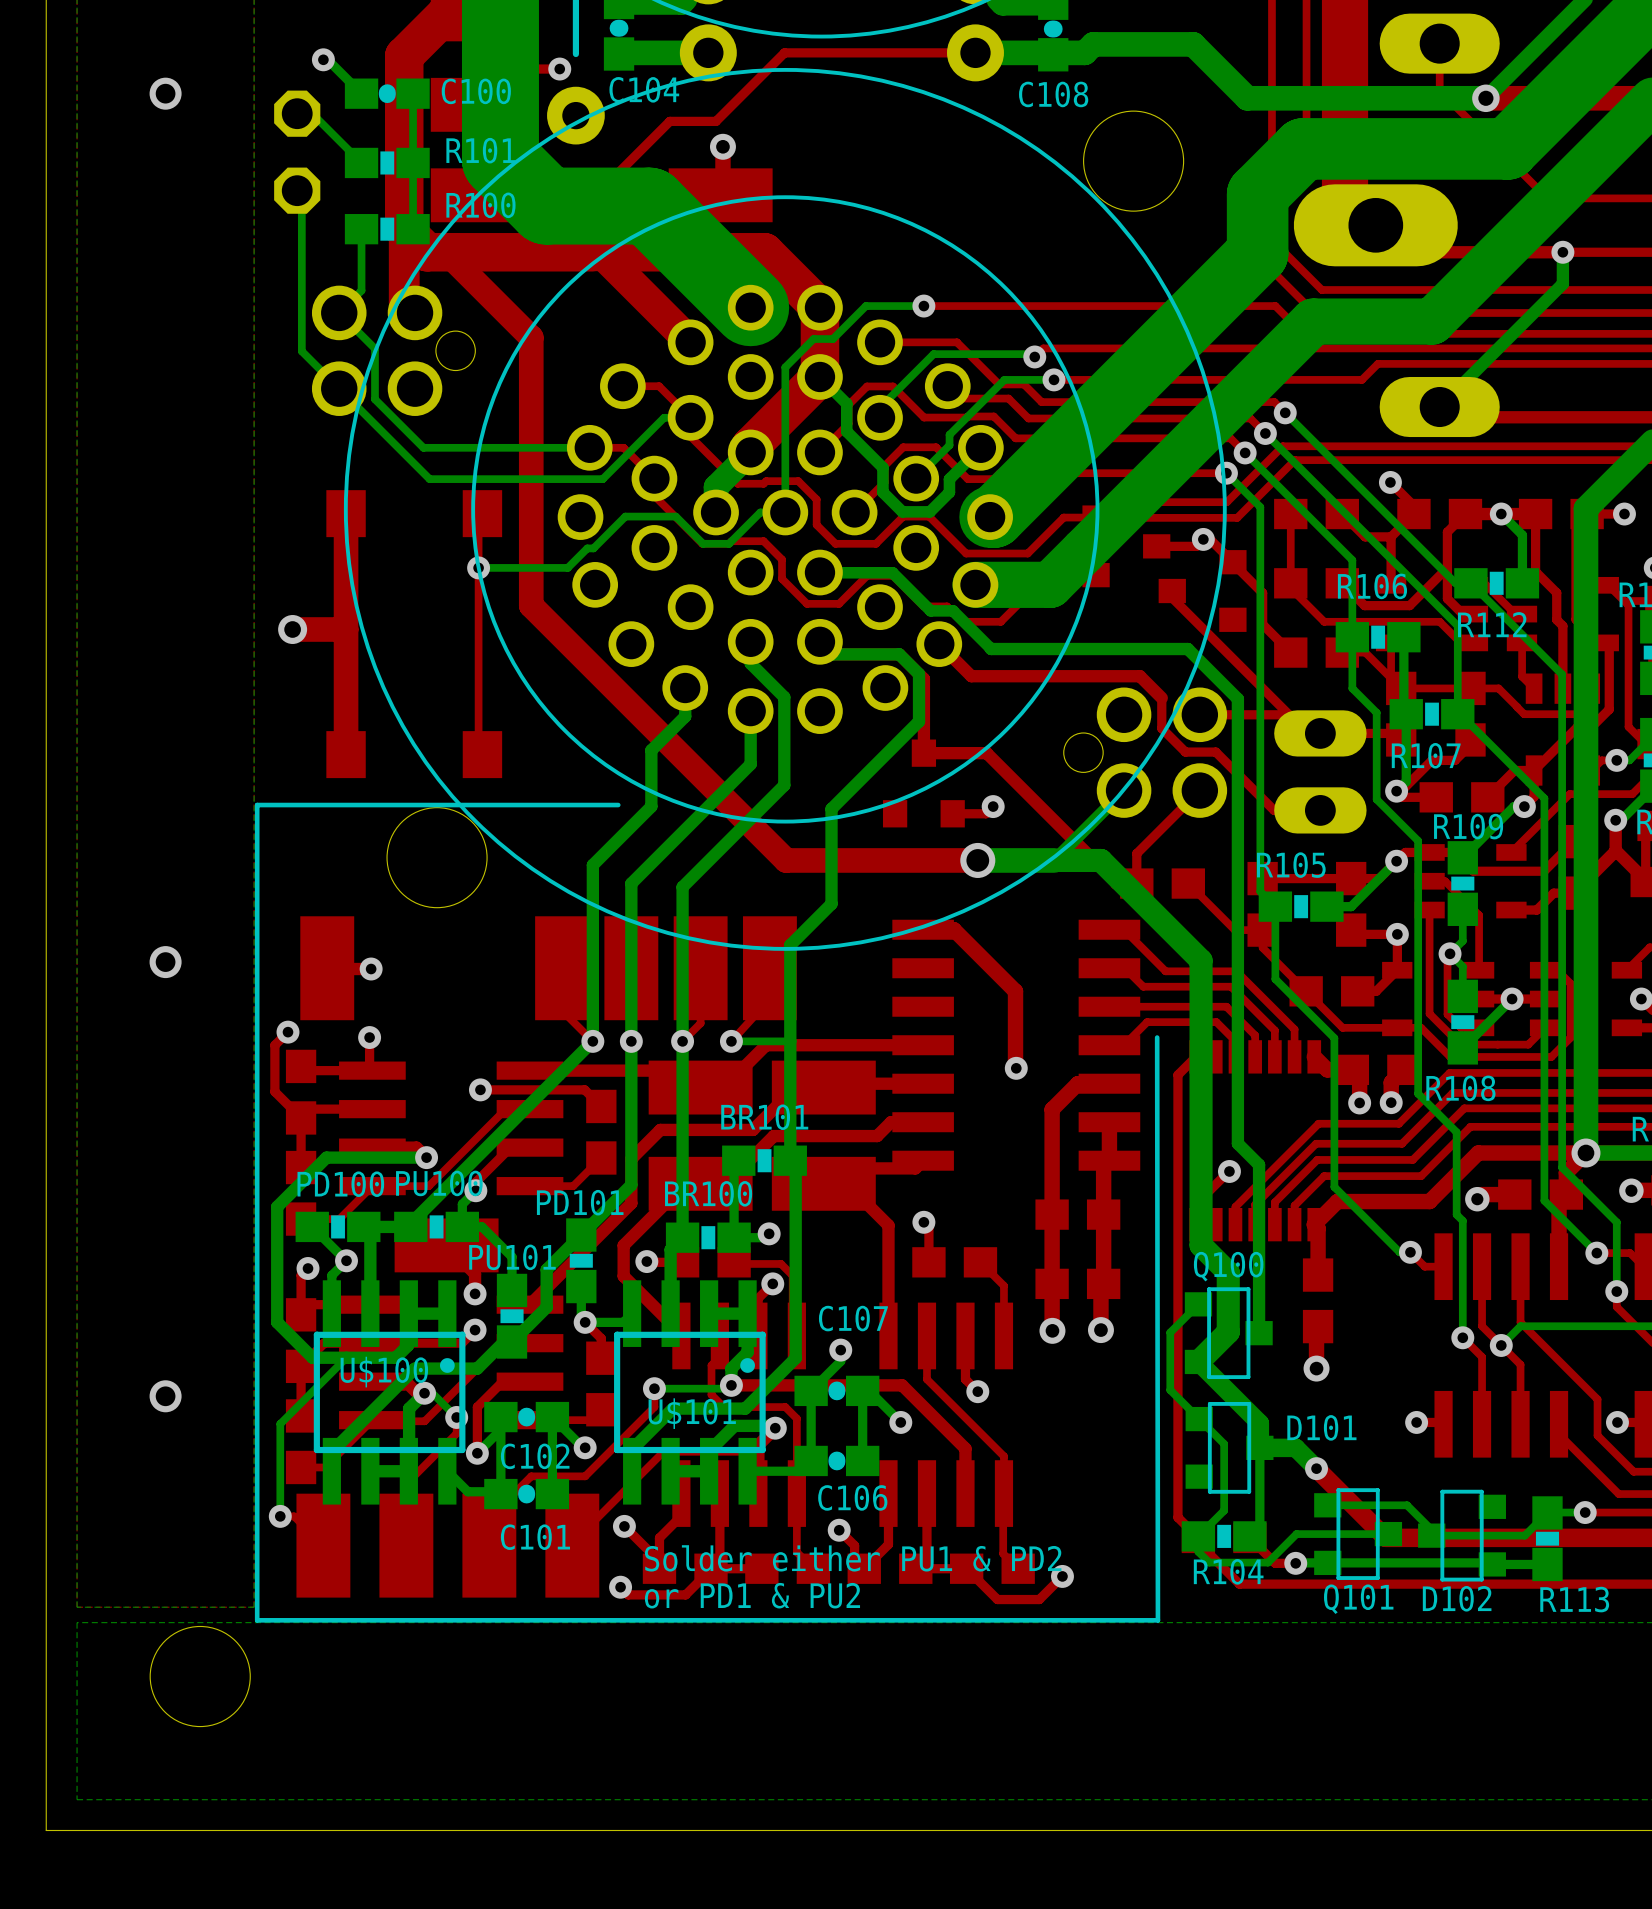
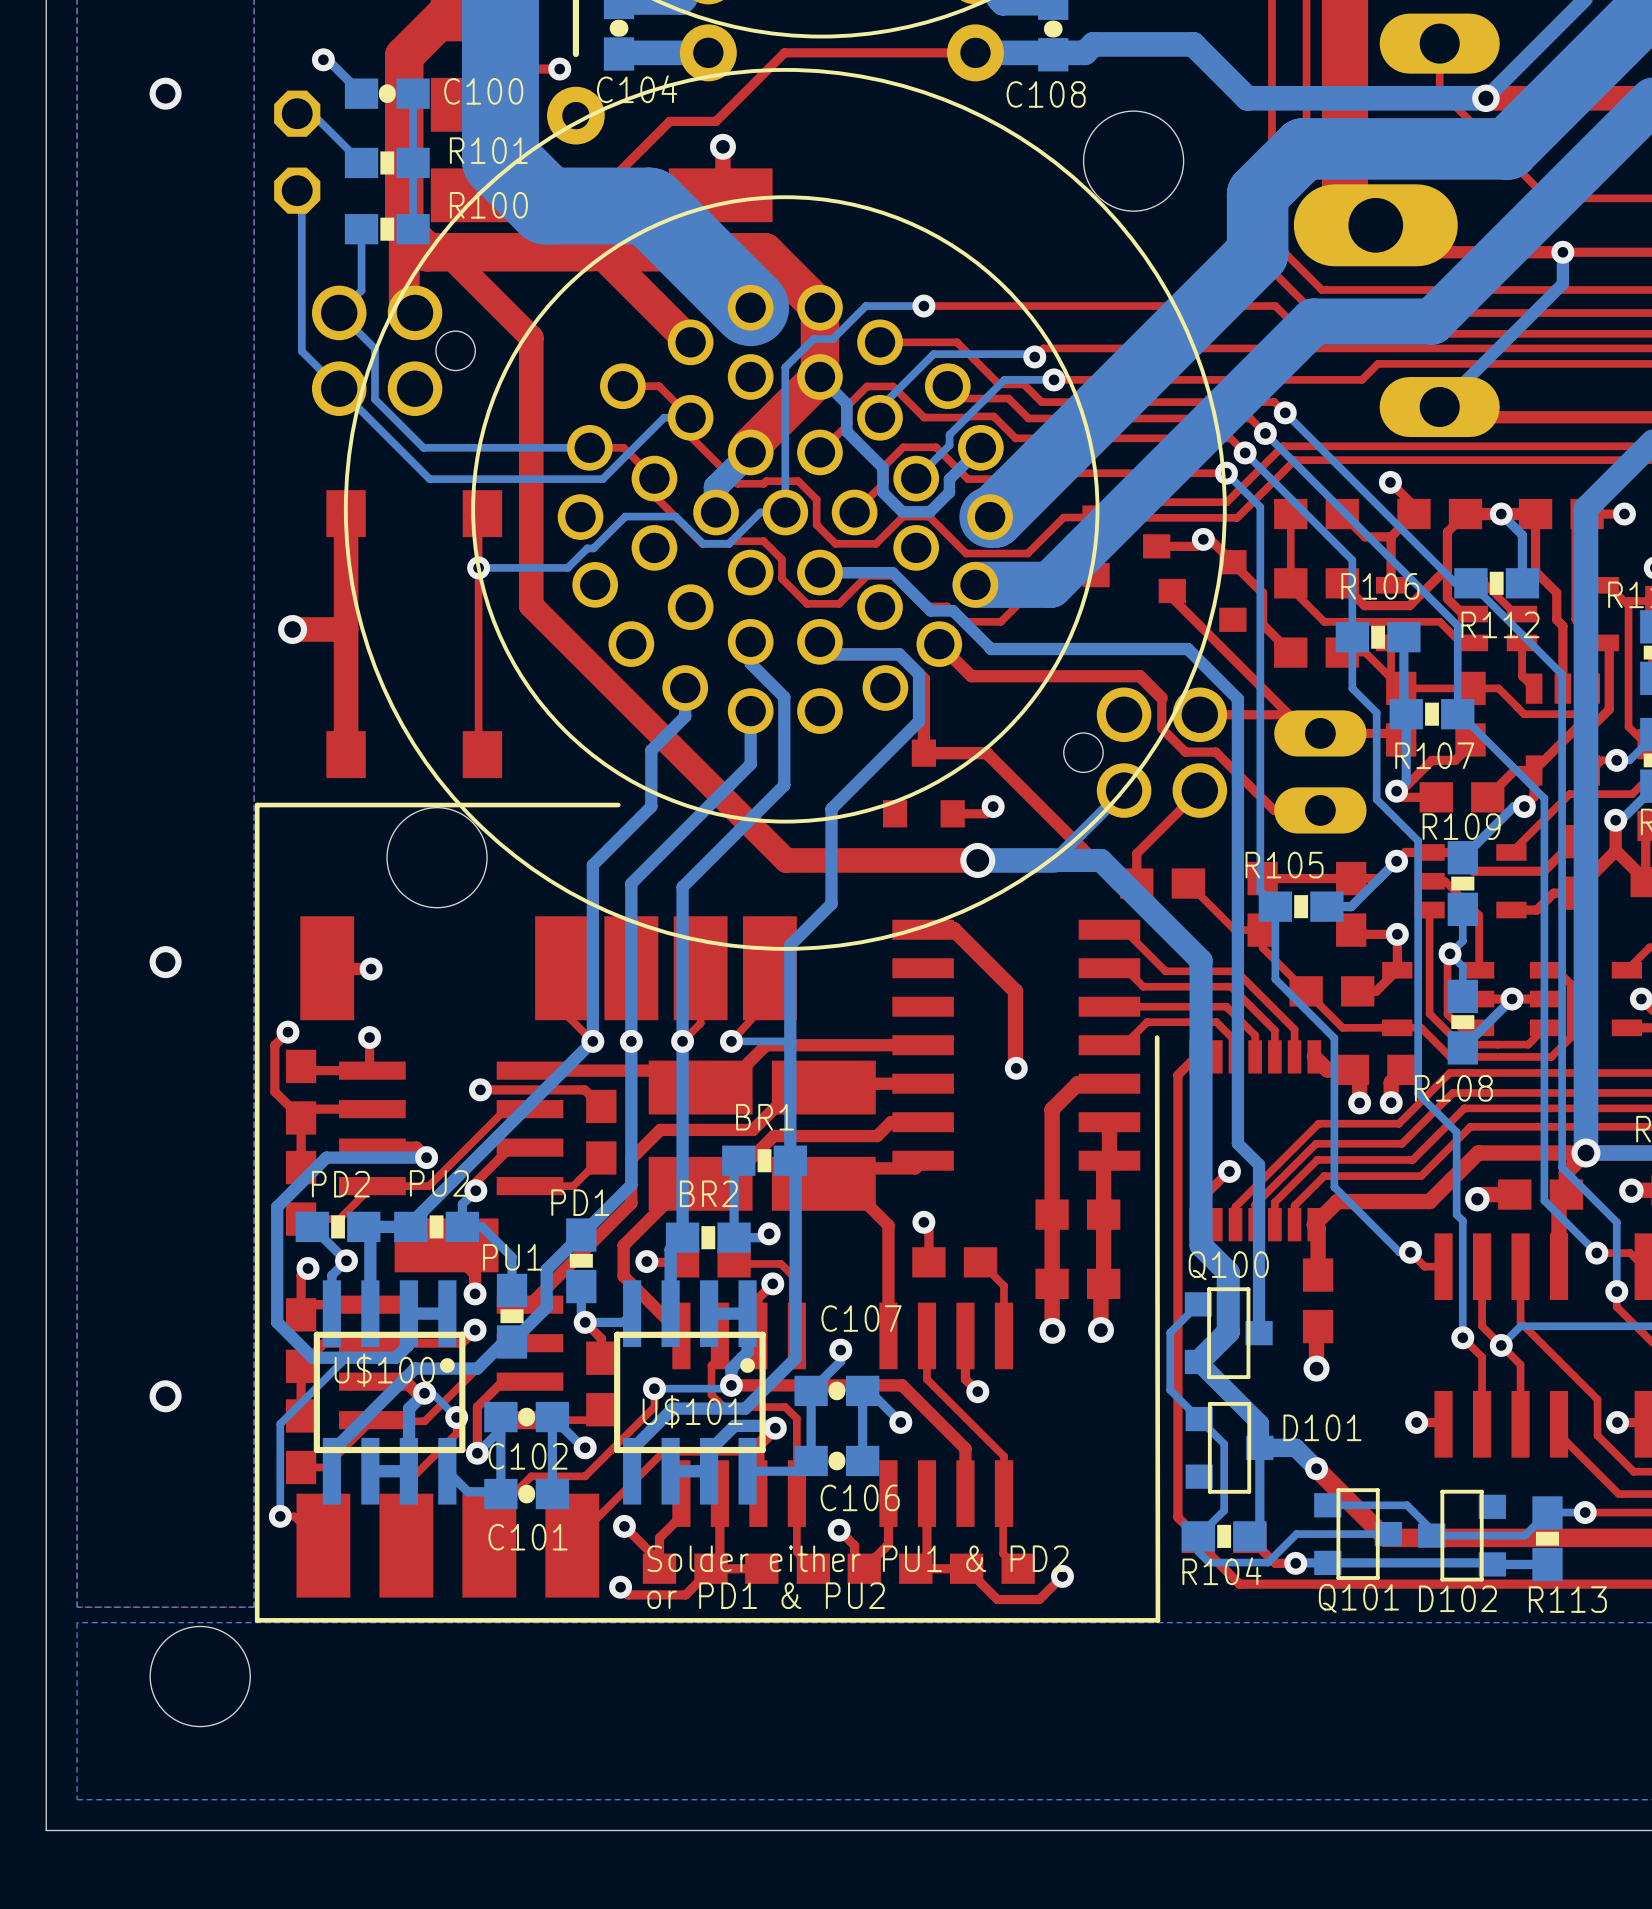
BR101 name: BR101 (764, 1117) -> BR1 (765, 1117)
PU100 name: PU100 (439, 1183) -> PU2 (439, 1183)
PD100 name: PD100 (340, 1184) -> PD2 (340, 1184)
BR100 name: BR100 (708, 1193) -> BR2 (708, 1193)
PD101 name: PD101 (580, 1202) -> PD1 (580, 1202)
PU101 name: PU101 (512, 1257) -> PU1 (512, 1257)

